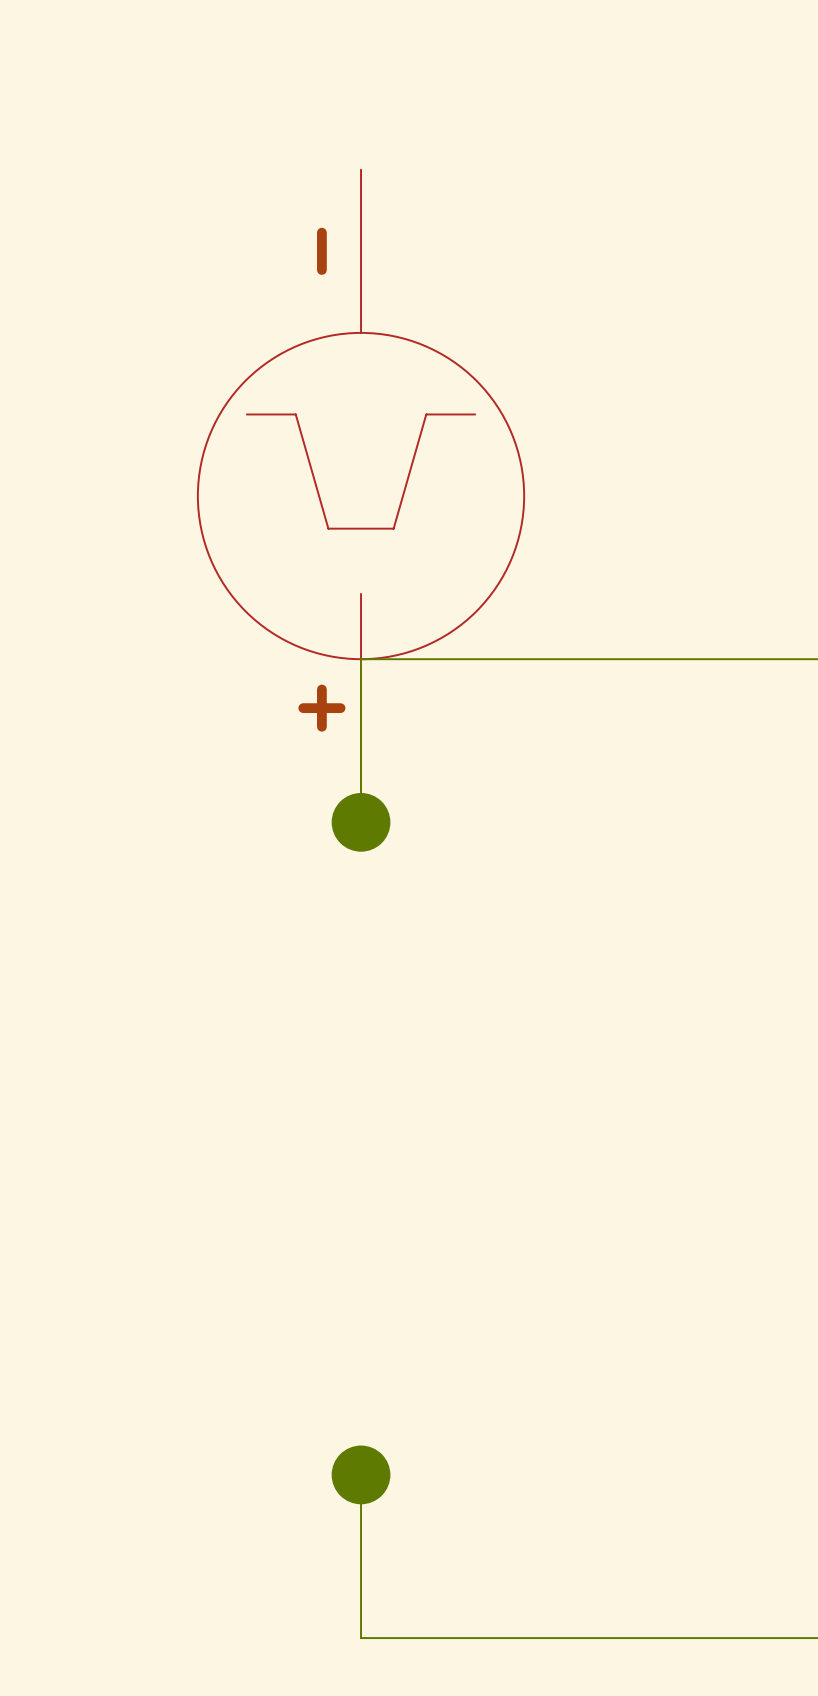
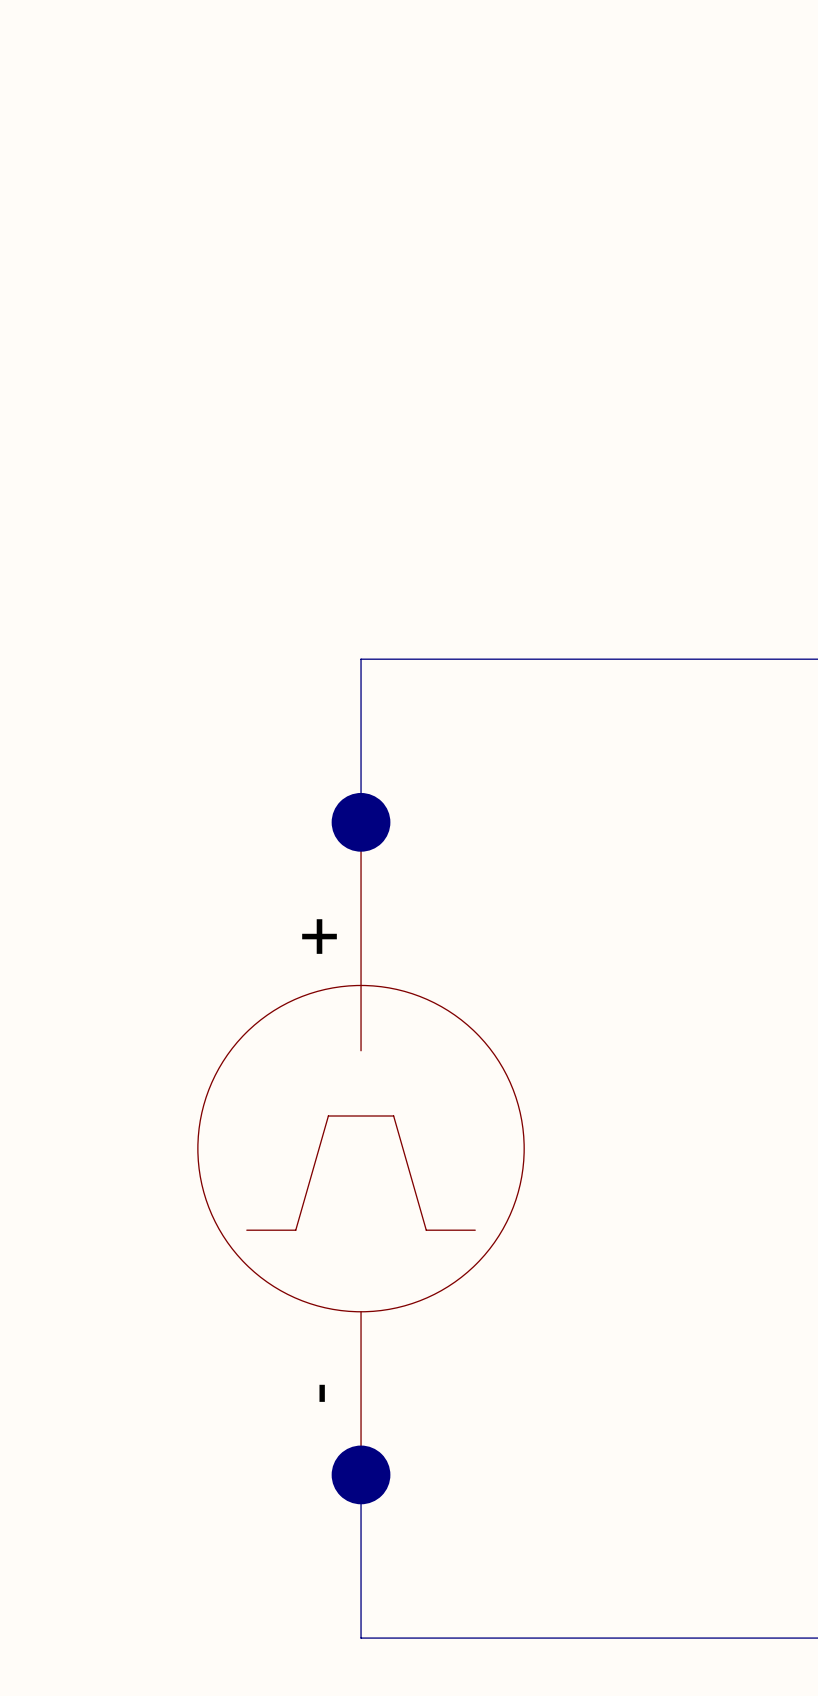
part rotation: 0° (361, 496) -> 180° (361, 1148)
part position: (361, 496) -> (361, 1148)

